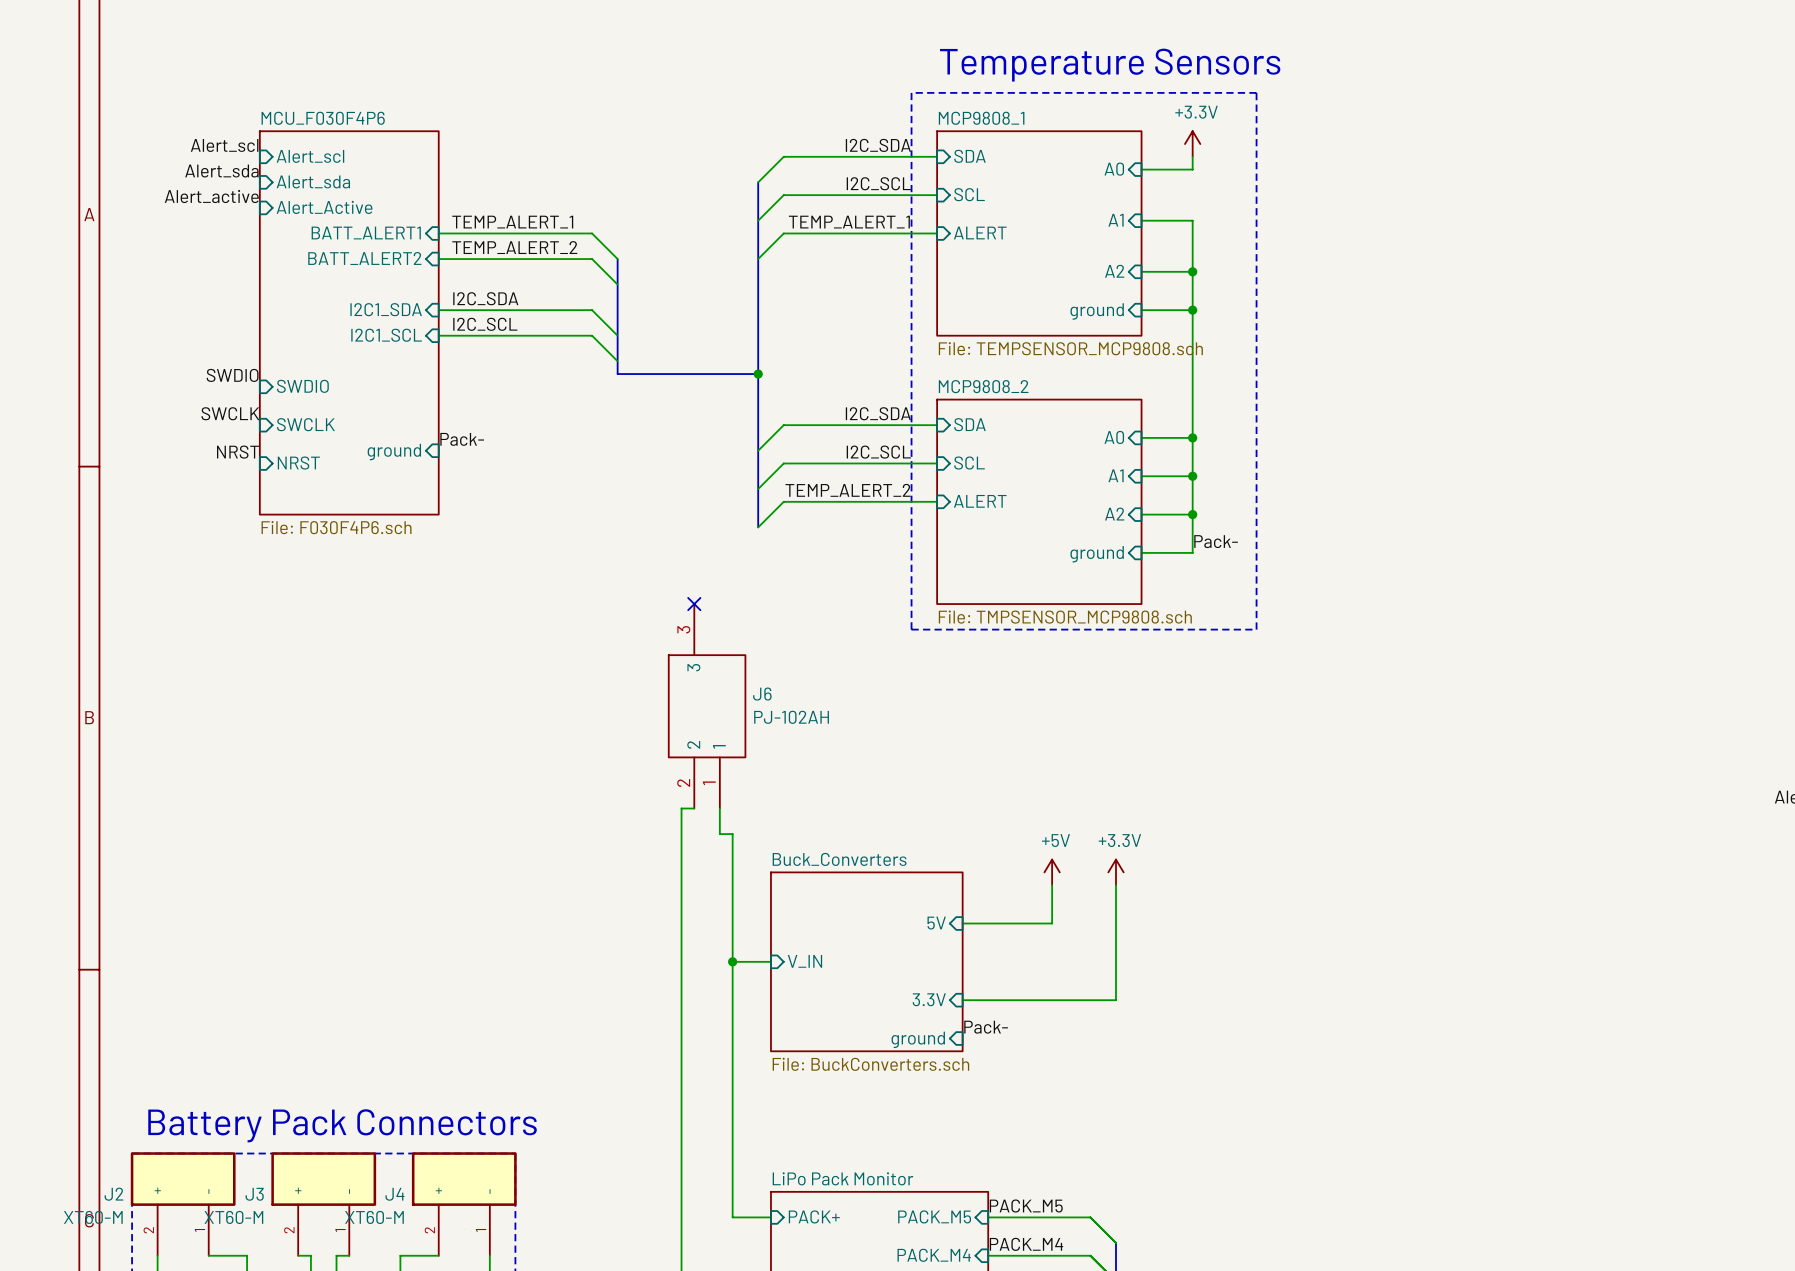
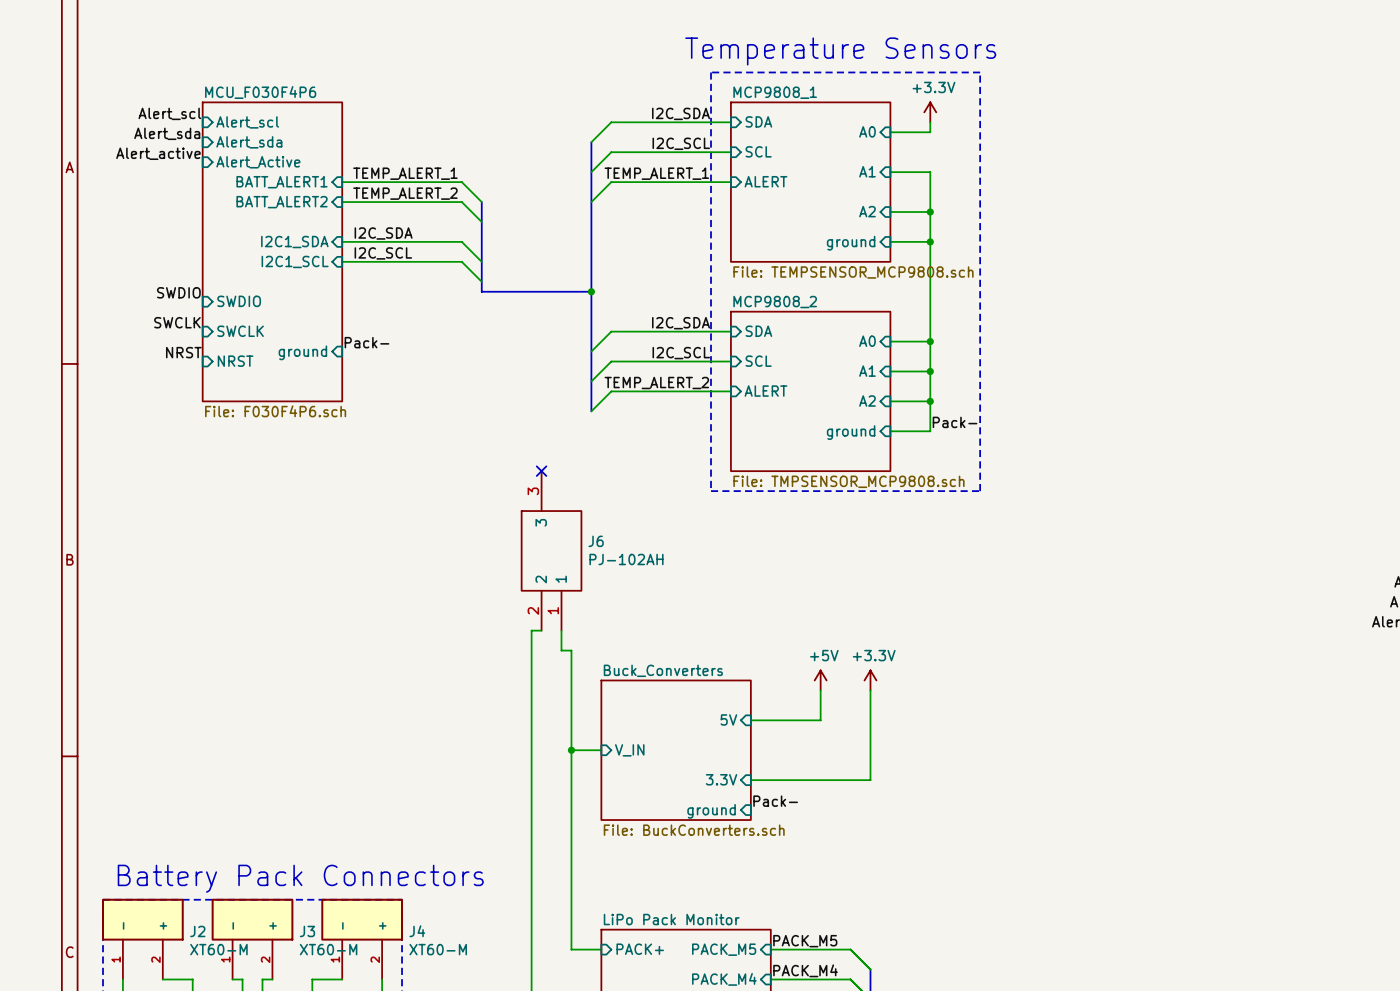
J2 flip: as is (183, 1179) -> left-right (142, 919)
J3 flip: as is (323, 1179) -> left-right (252, 919)
J4 flip: as is (464, 1179) -> left-right (362, 919)

